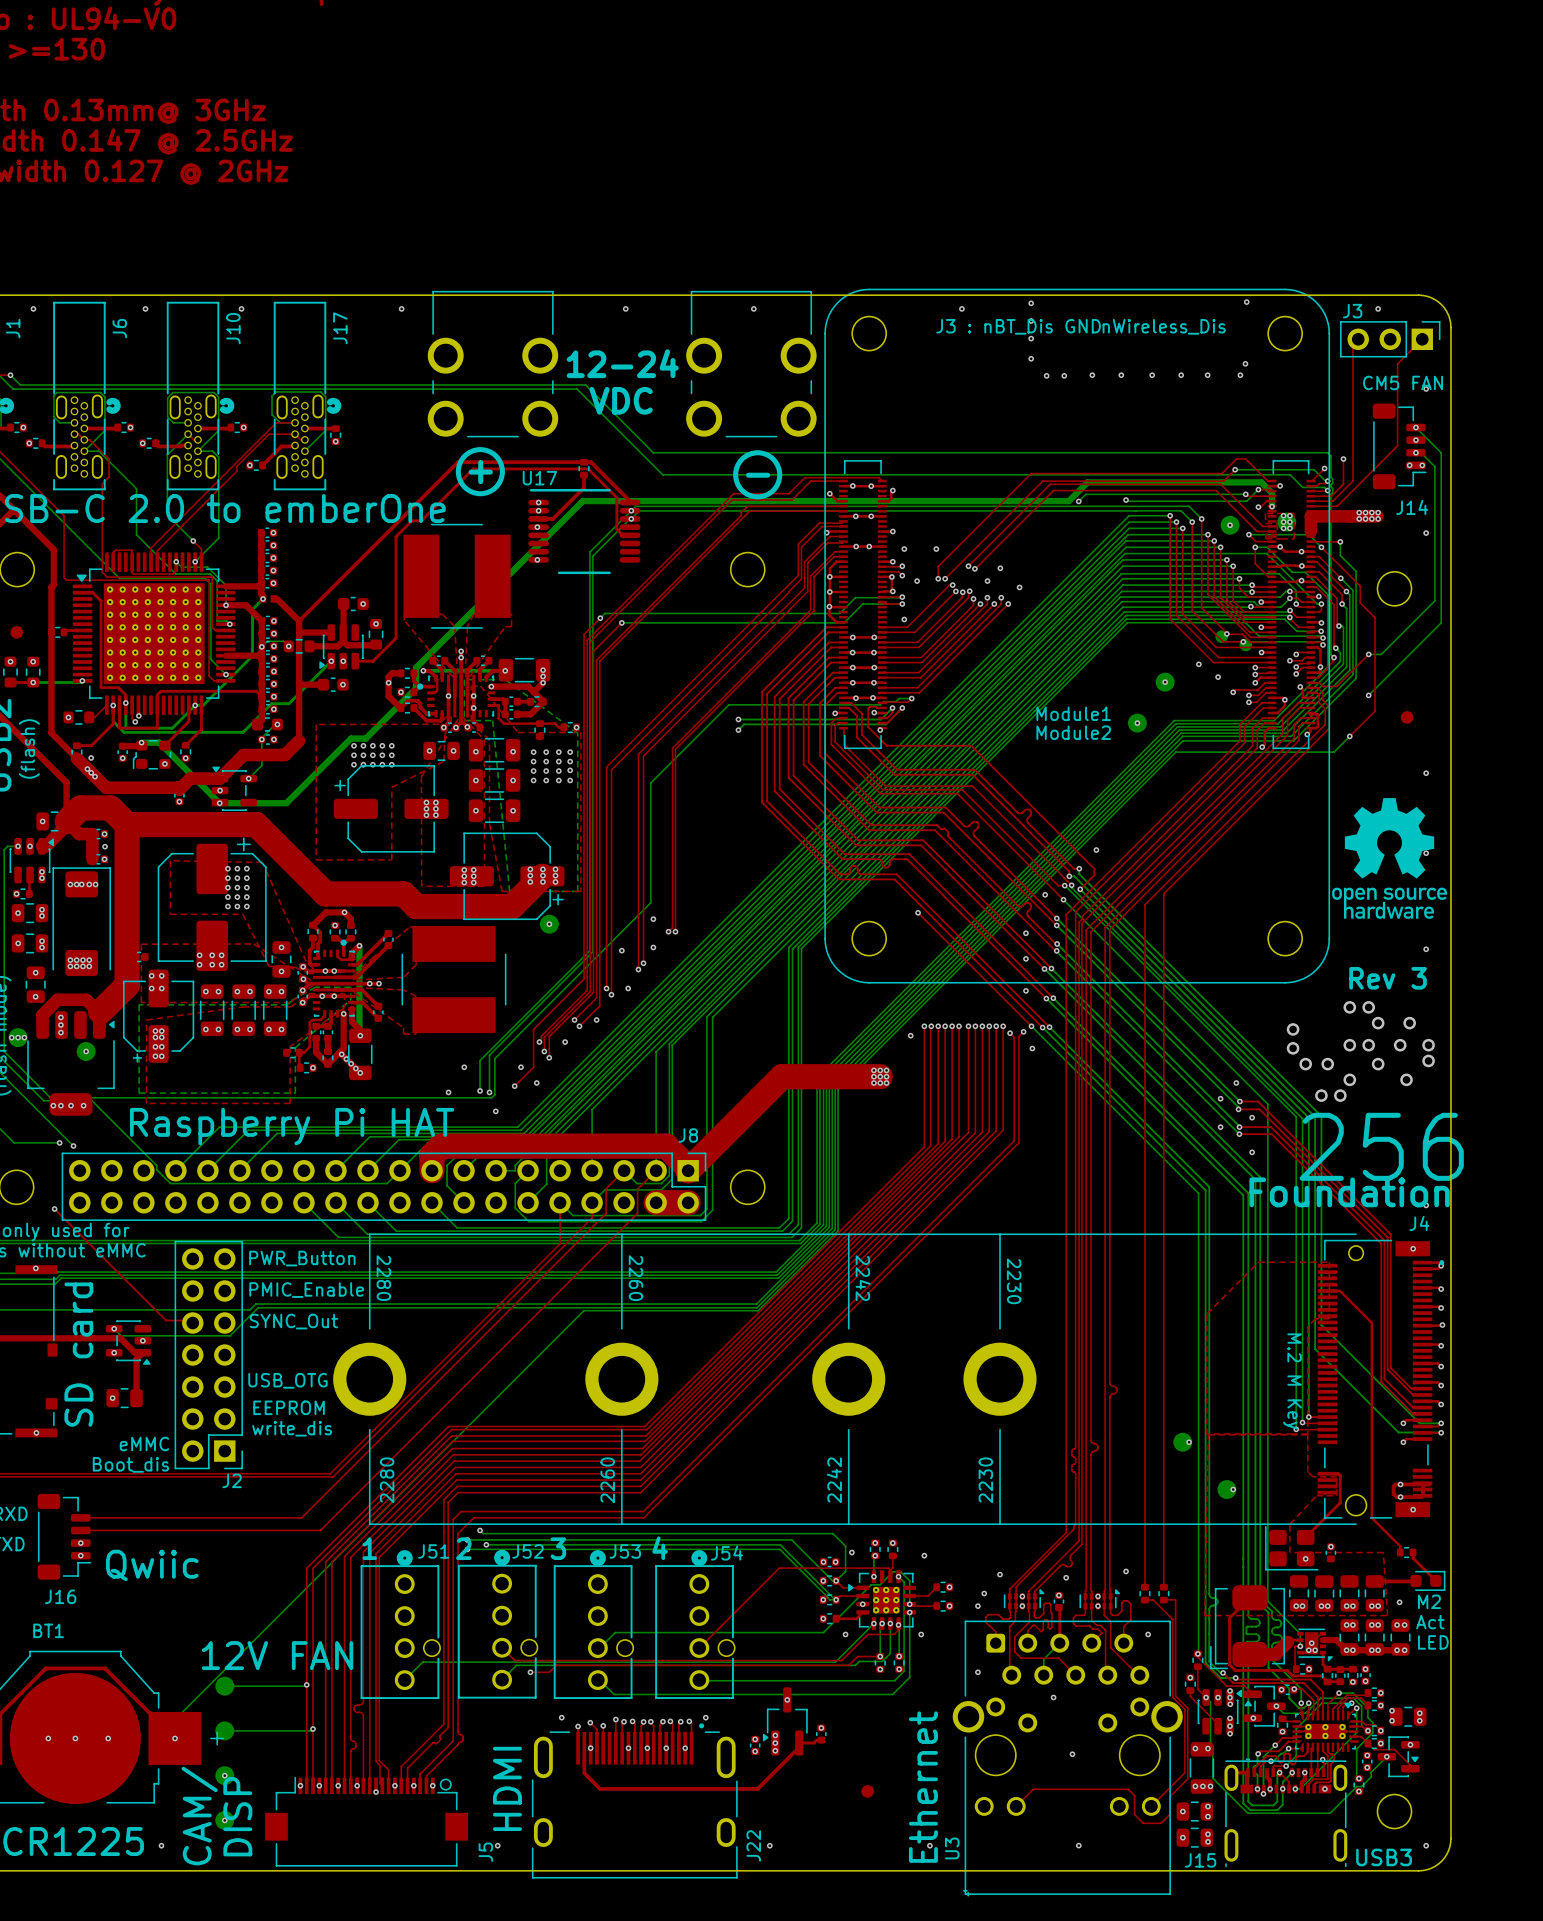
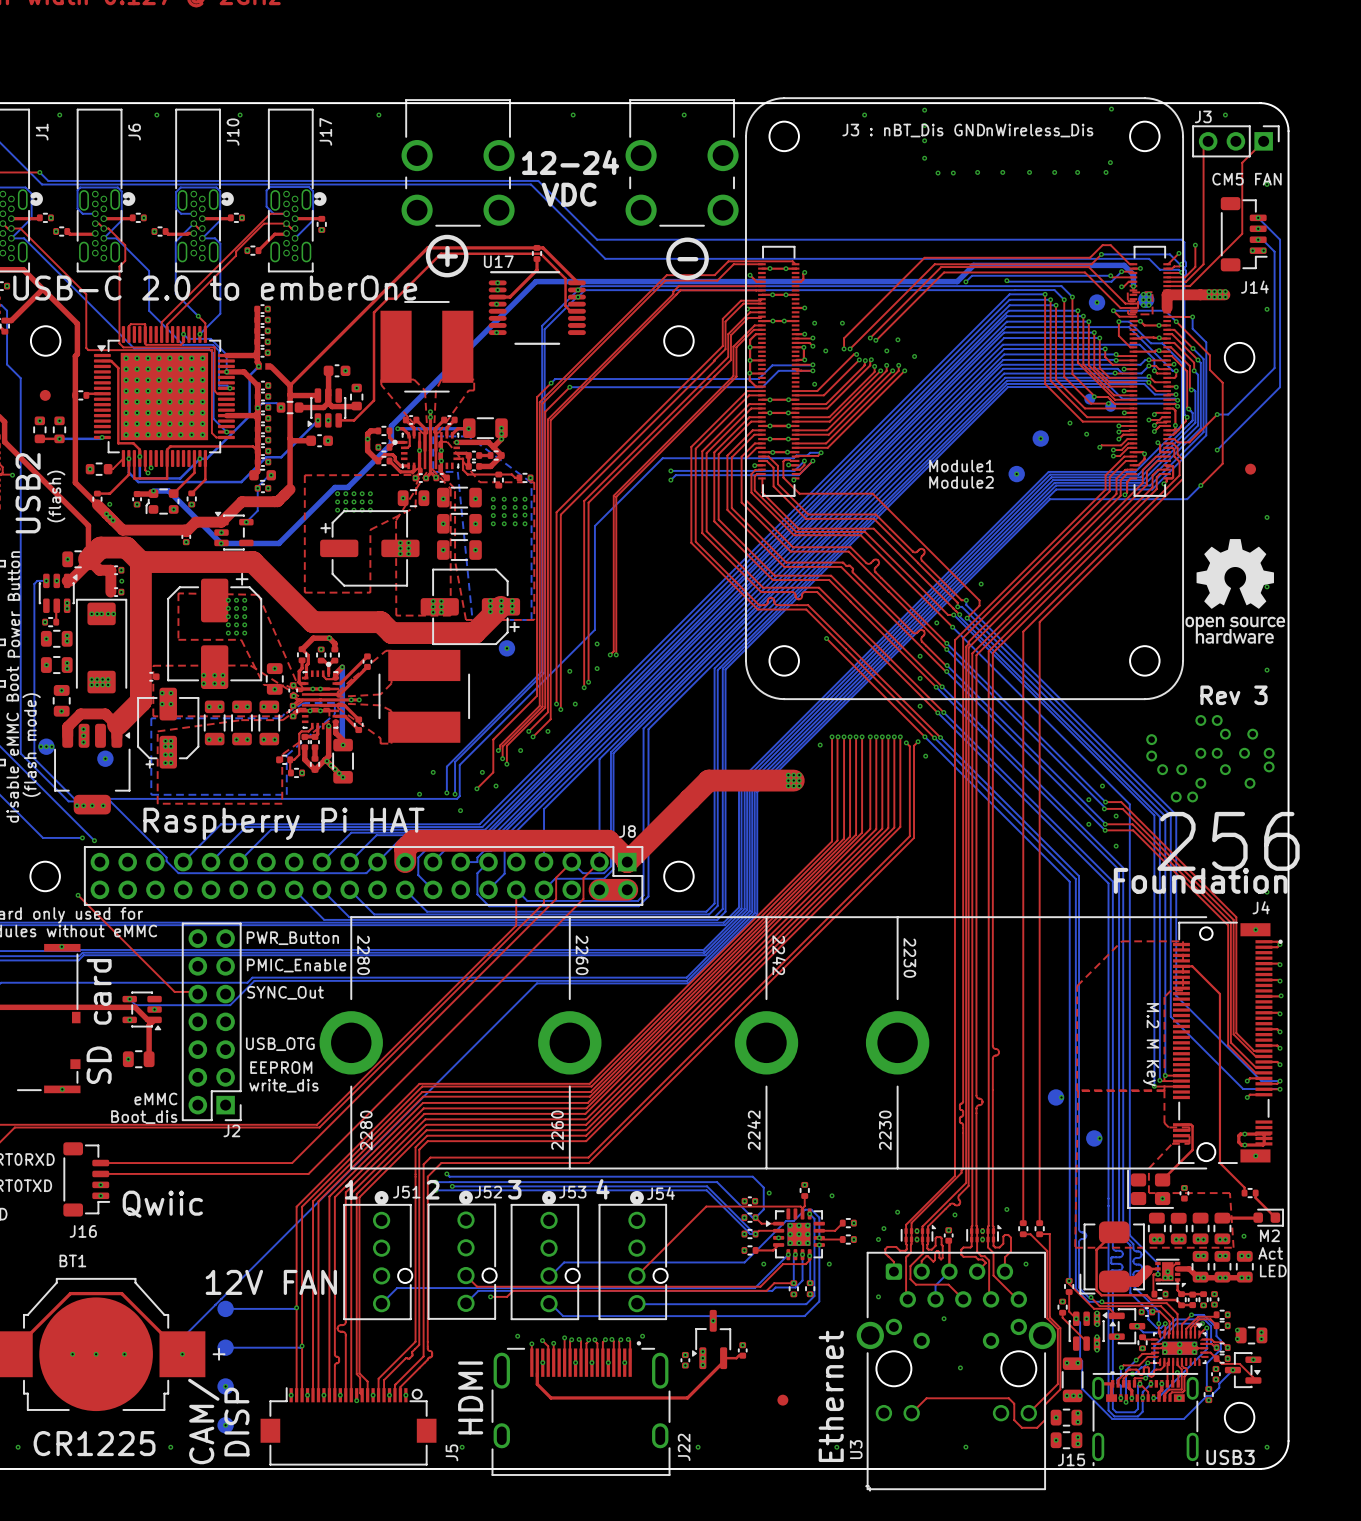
via: (875, 1542) -> none
part: (875, 1549) -> none
bottom track: (875, 1555) (873, 1576) -> none
via: (875, 1555) -> none
via: (873, 1576) -> none

